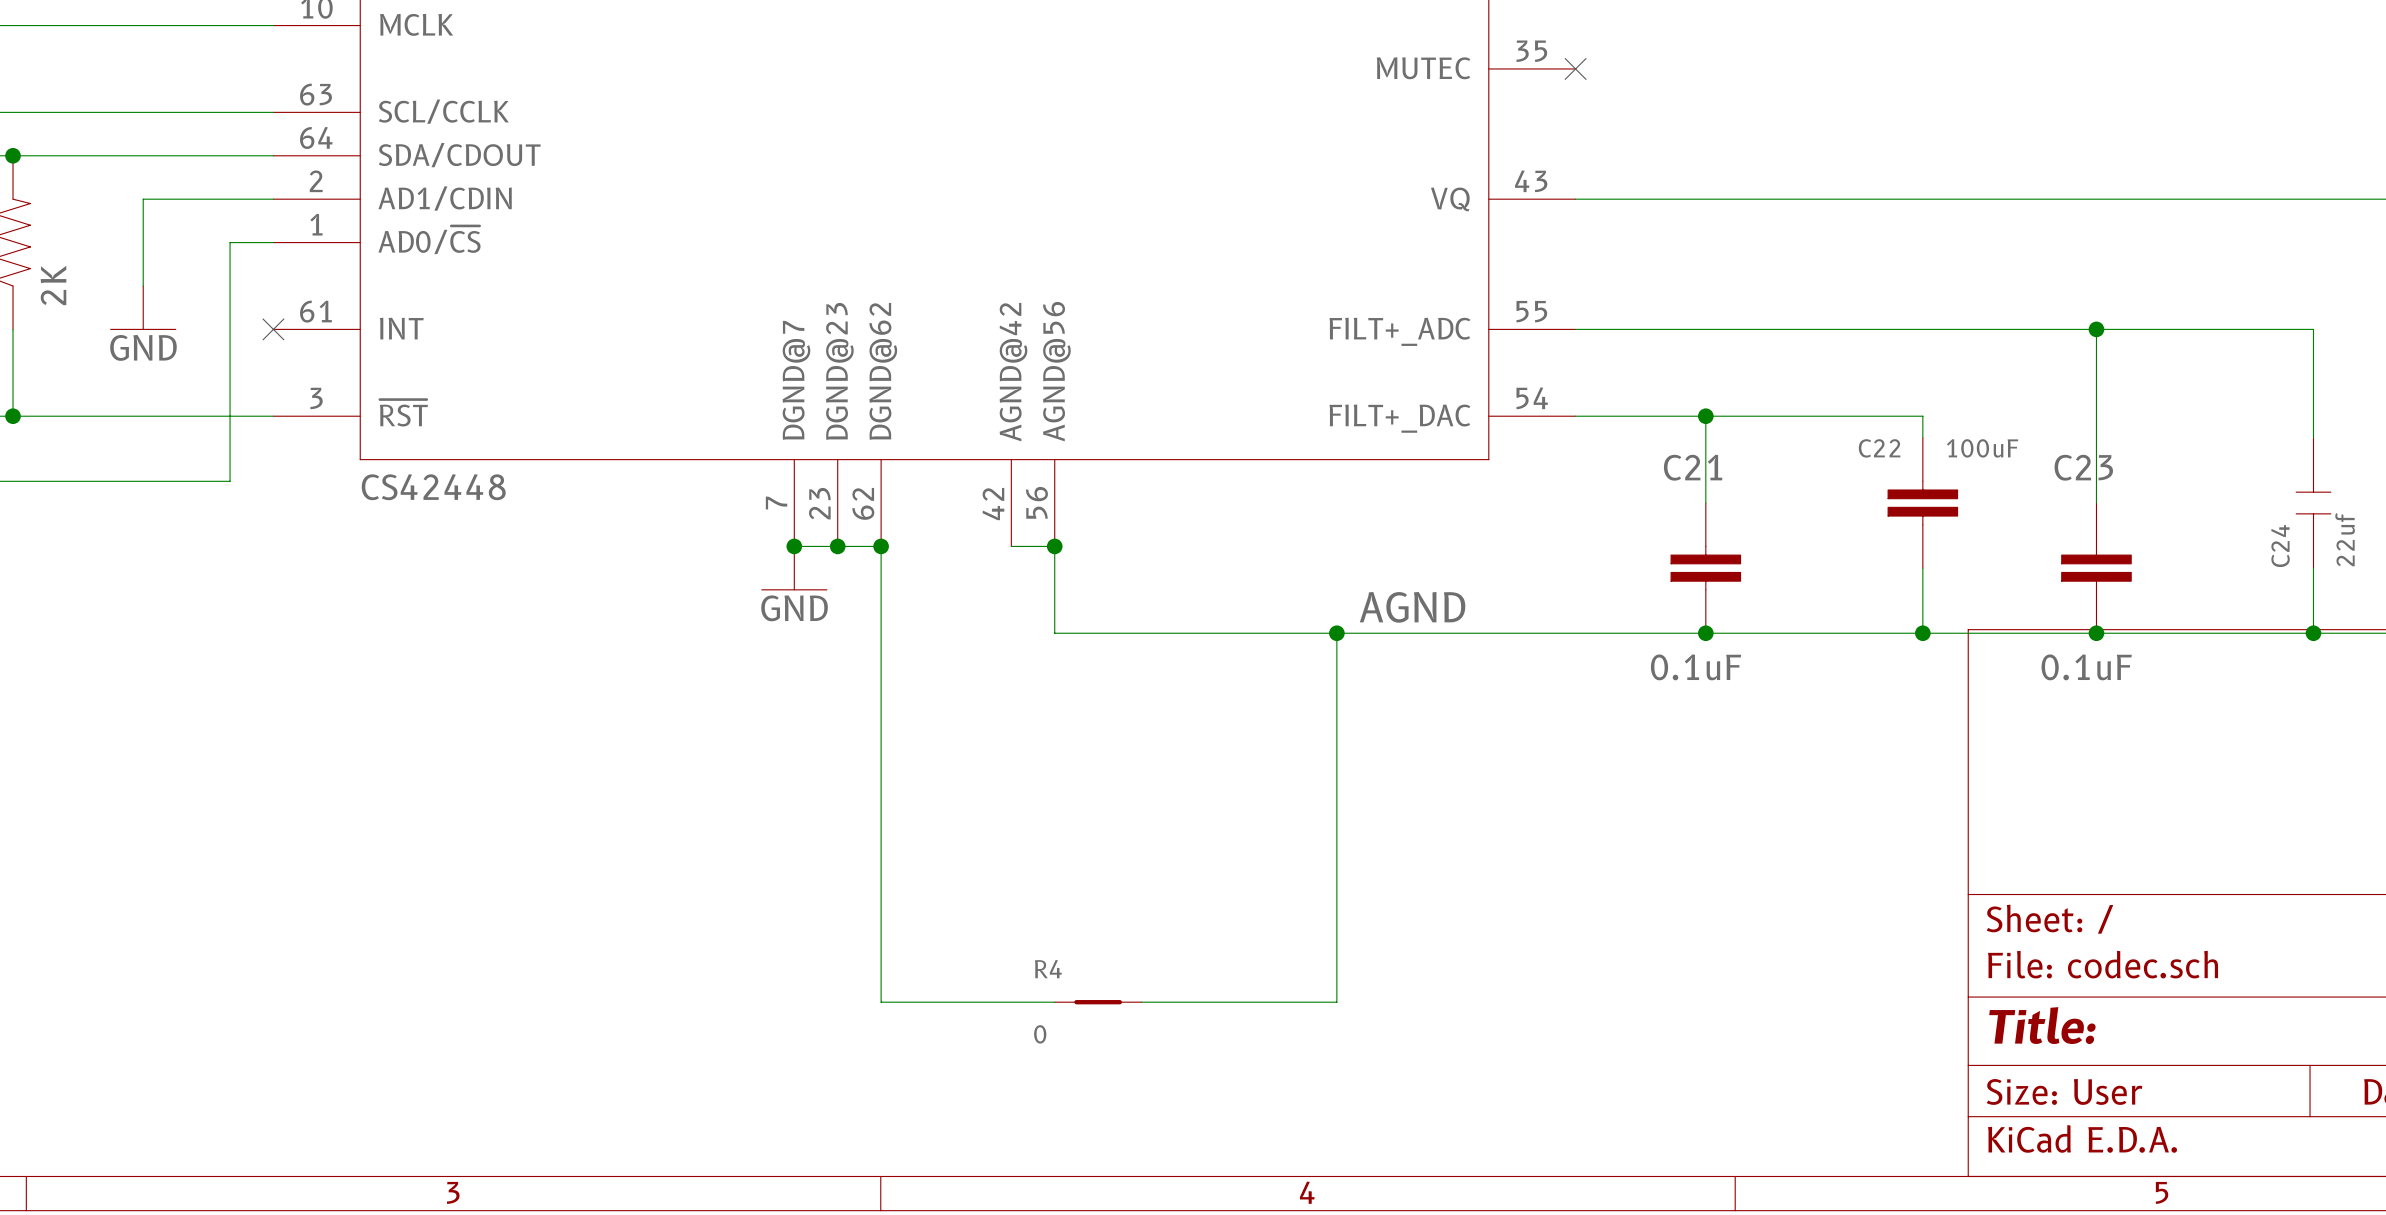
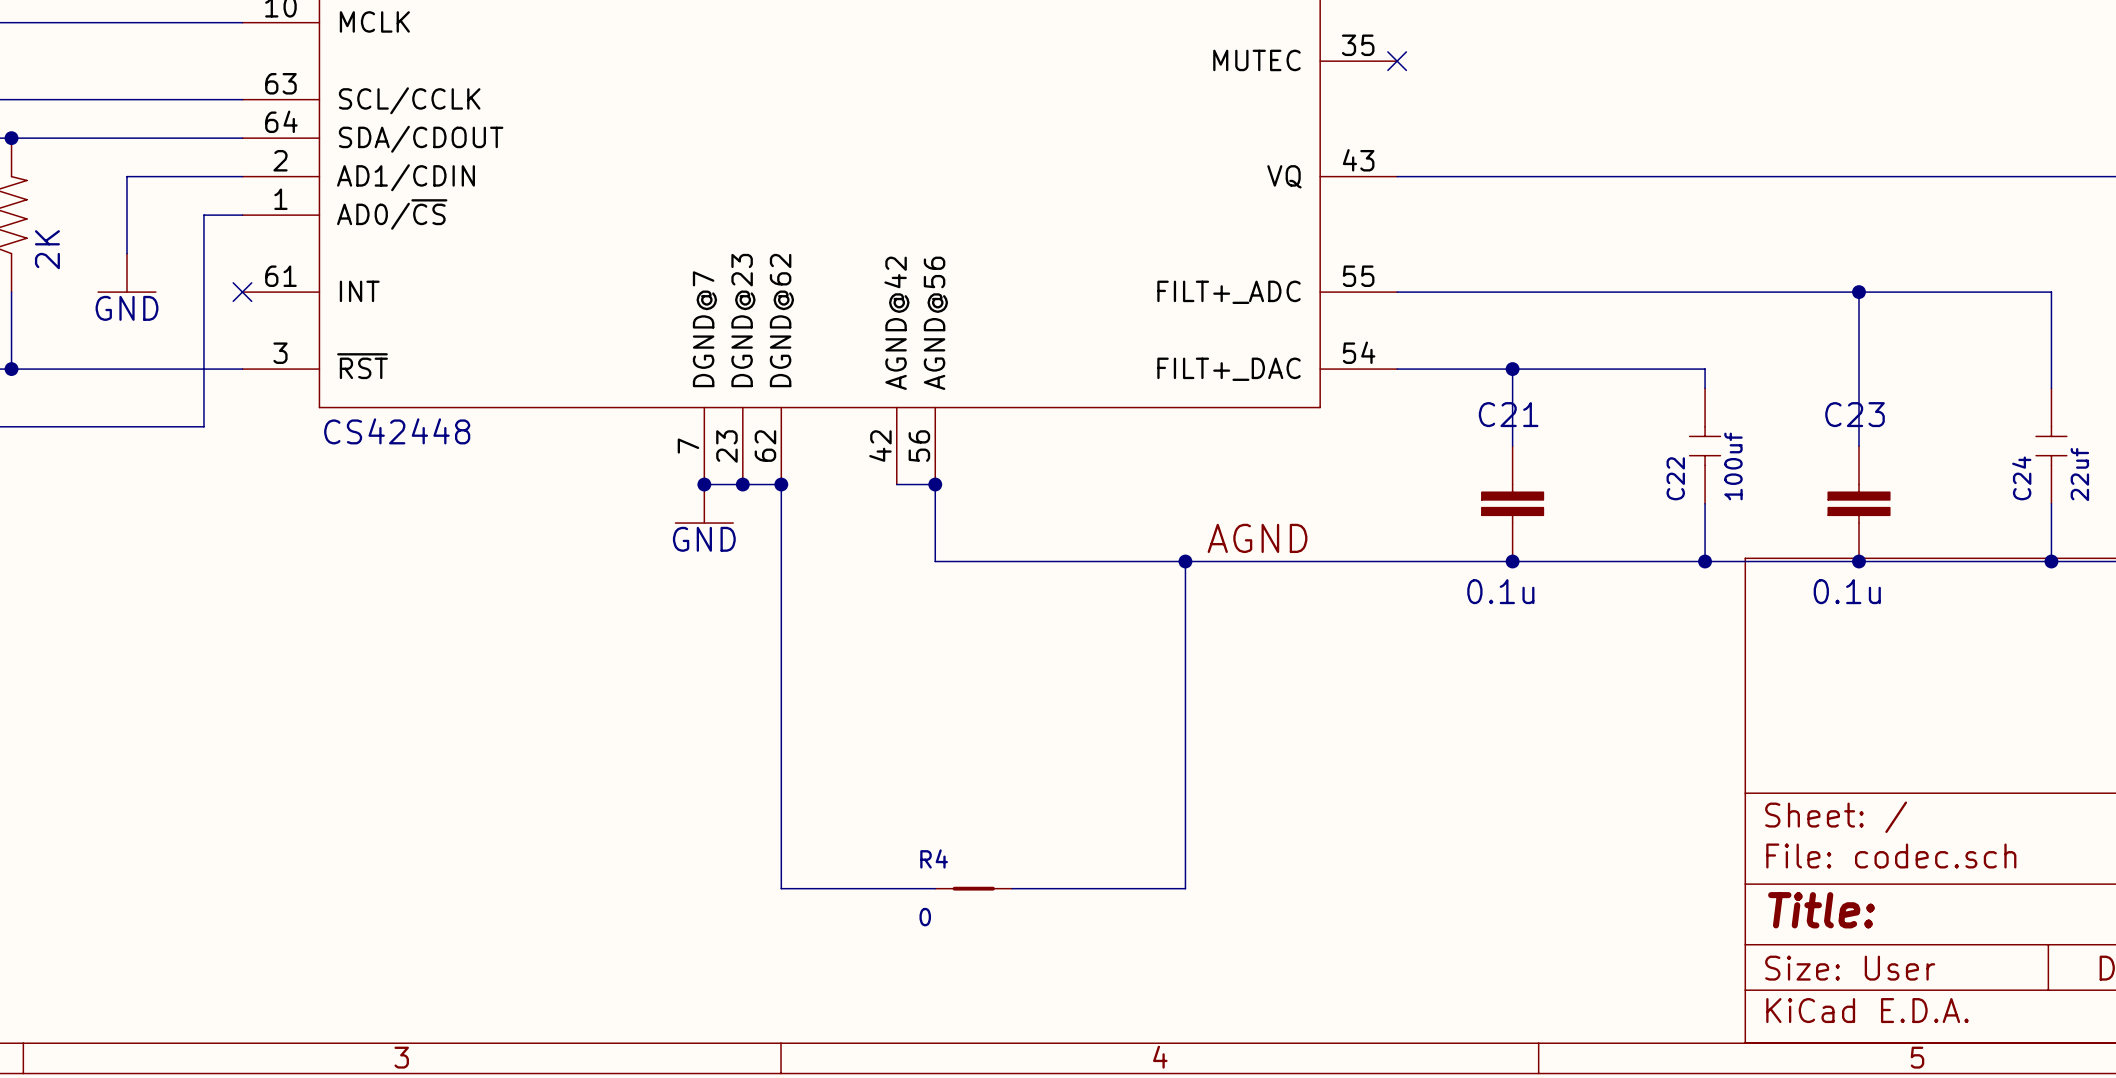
C22 symbol: [1888, 437, 1958, 569] -> [1689, 388, 1721, 504]
C22 name position: C22 (1879, 448) -> C22 (1675, 478)
C22 value: 100uF (1982, 448) -> 100uf (1733, 466)
C21 value: 0.1uF (1696, 667) -> 0.1u (1500, 591)
C23 value: 0.1uF (2086, 667) -> 0.1u (1847, 591)

